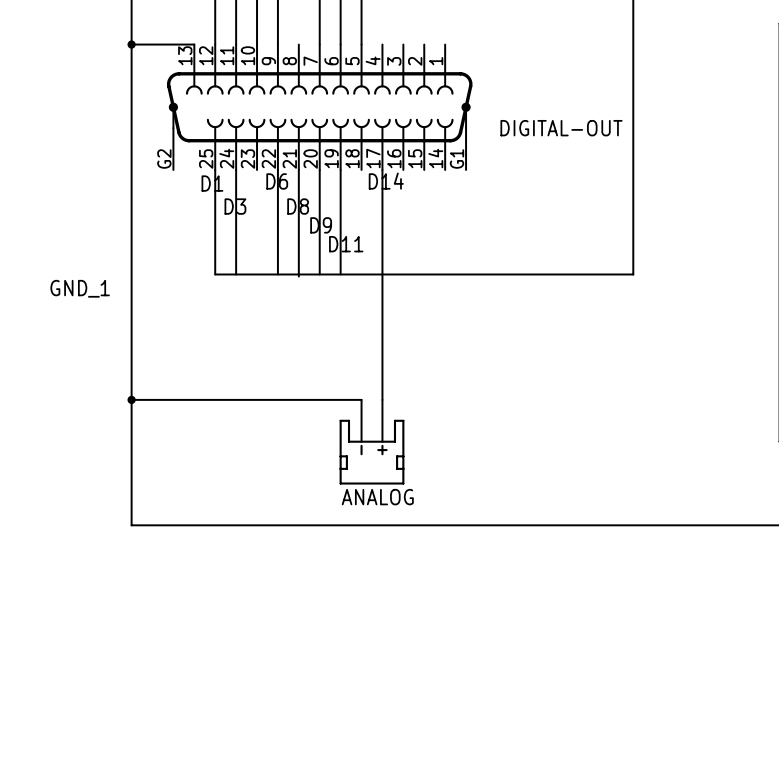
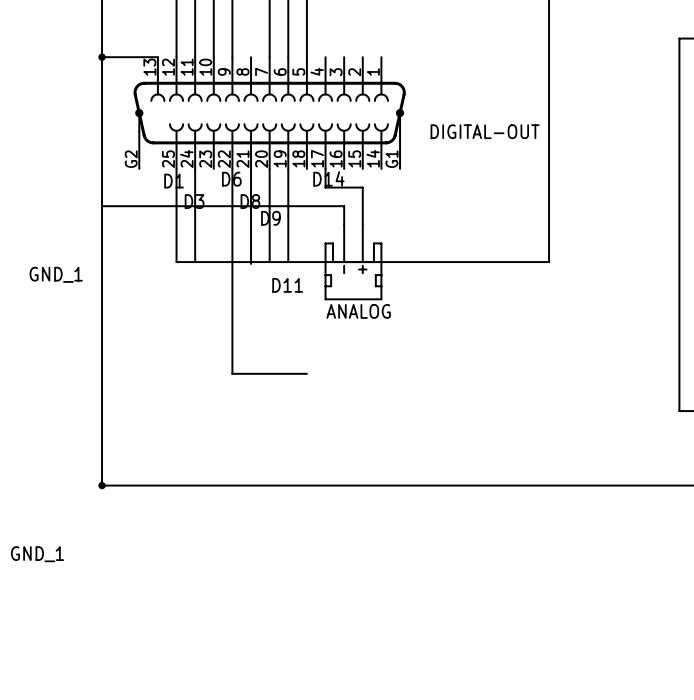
wire: (382, 190) (382, 399) -> (325, 187) (362, 187) (362, 224)
wire: none -> (102, 206) (344, 206) (344, 224)
label position: D11 (346, 244) -> D11 (287, 285)
wire: (131, 399) (277, 399) -> (232, 262) (232, 373)
junction: (131, 399) -> none
ANALOG position: (372, 442) -> (353, 262)
junction: none -> (102, 485)
label: none -> GND_1 (37, 554)

